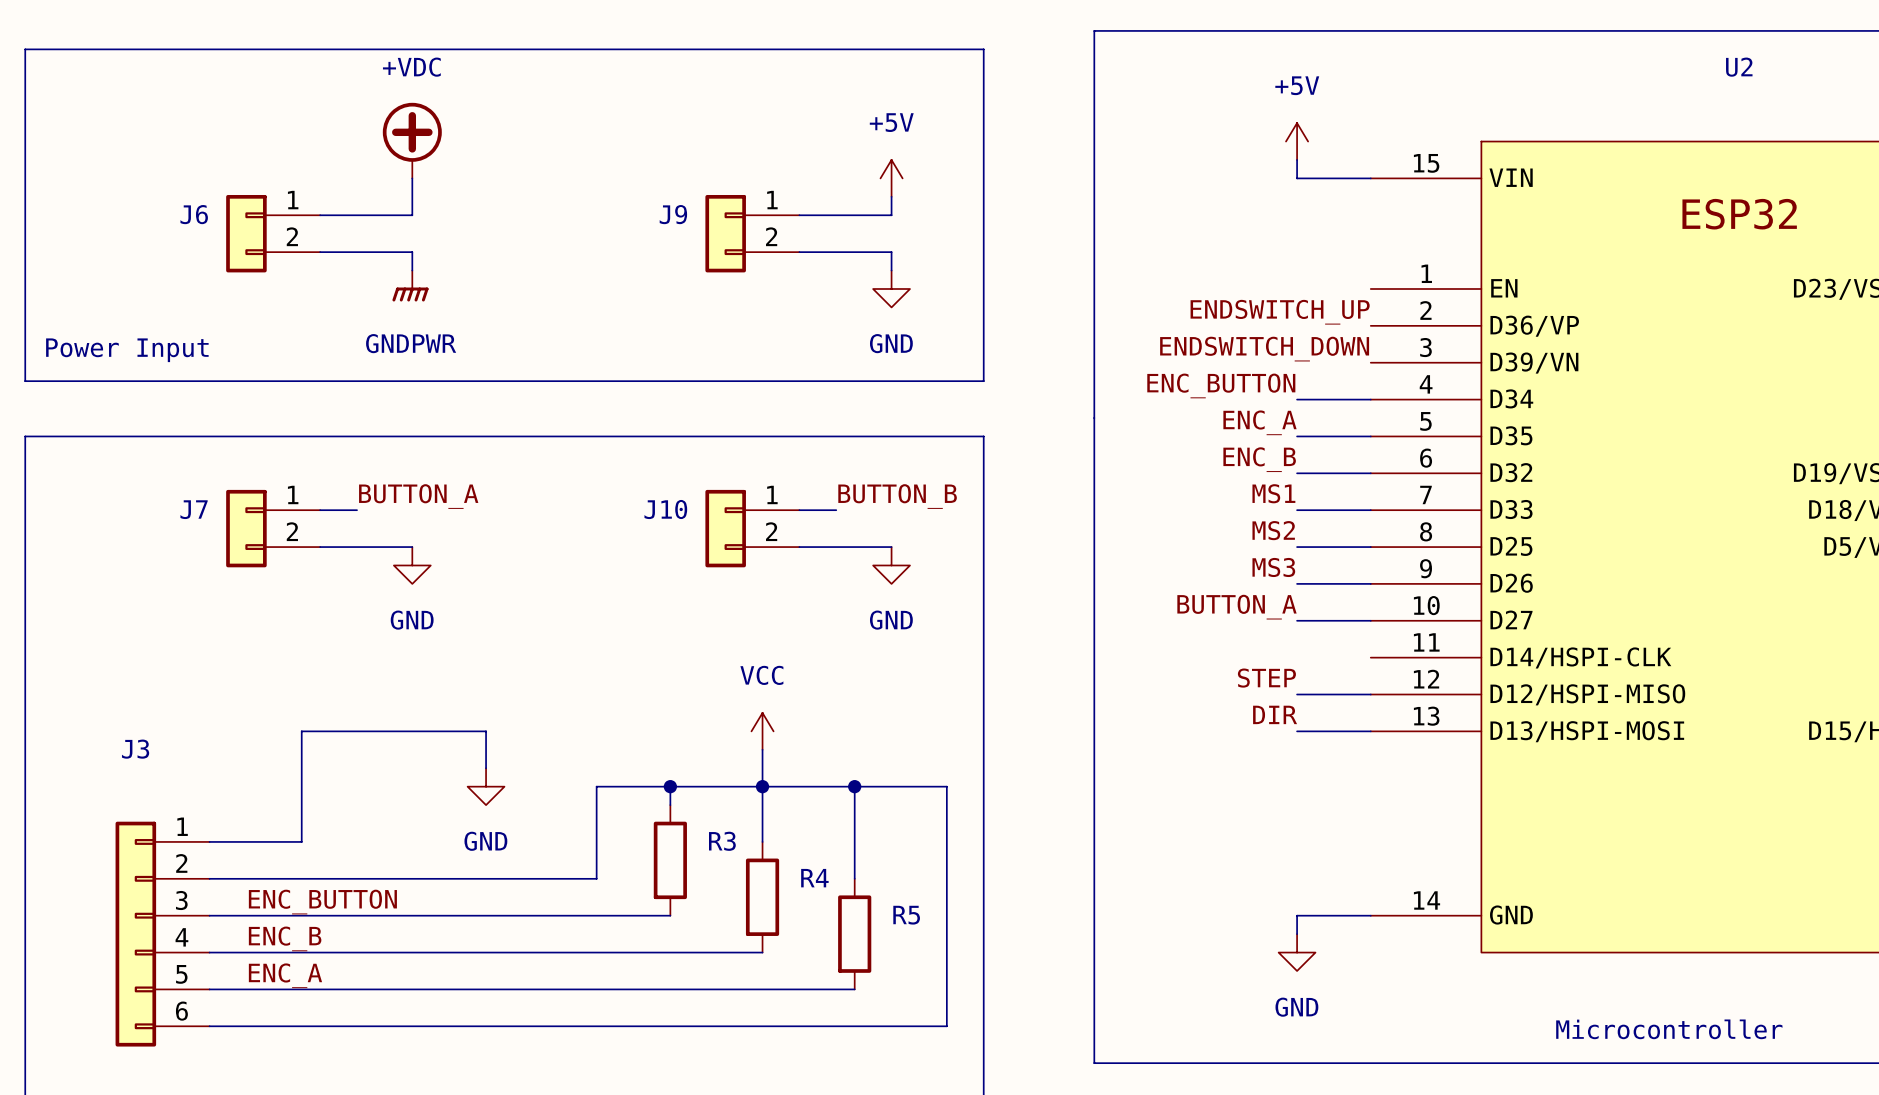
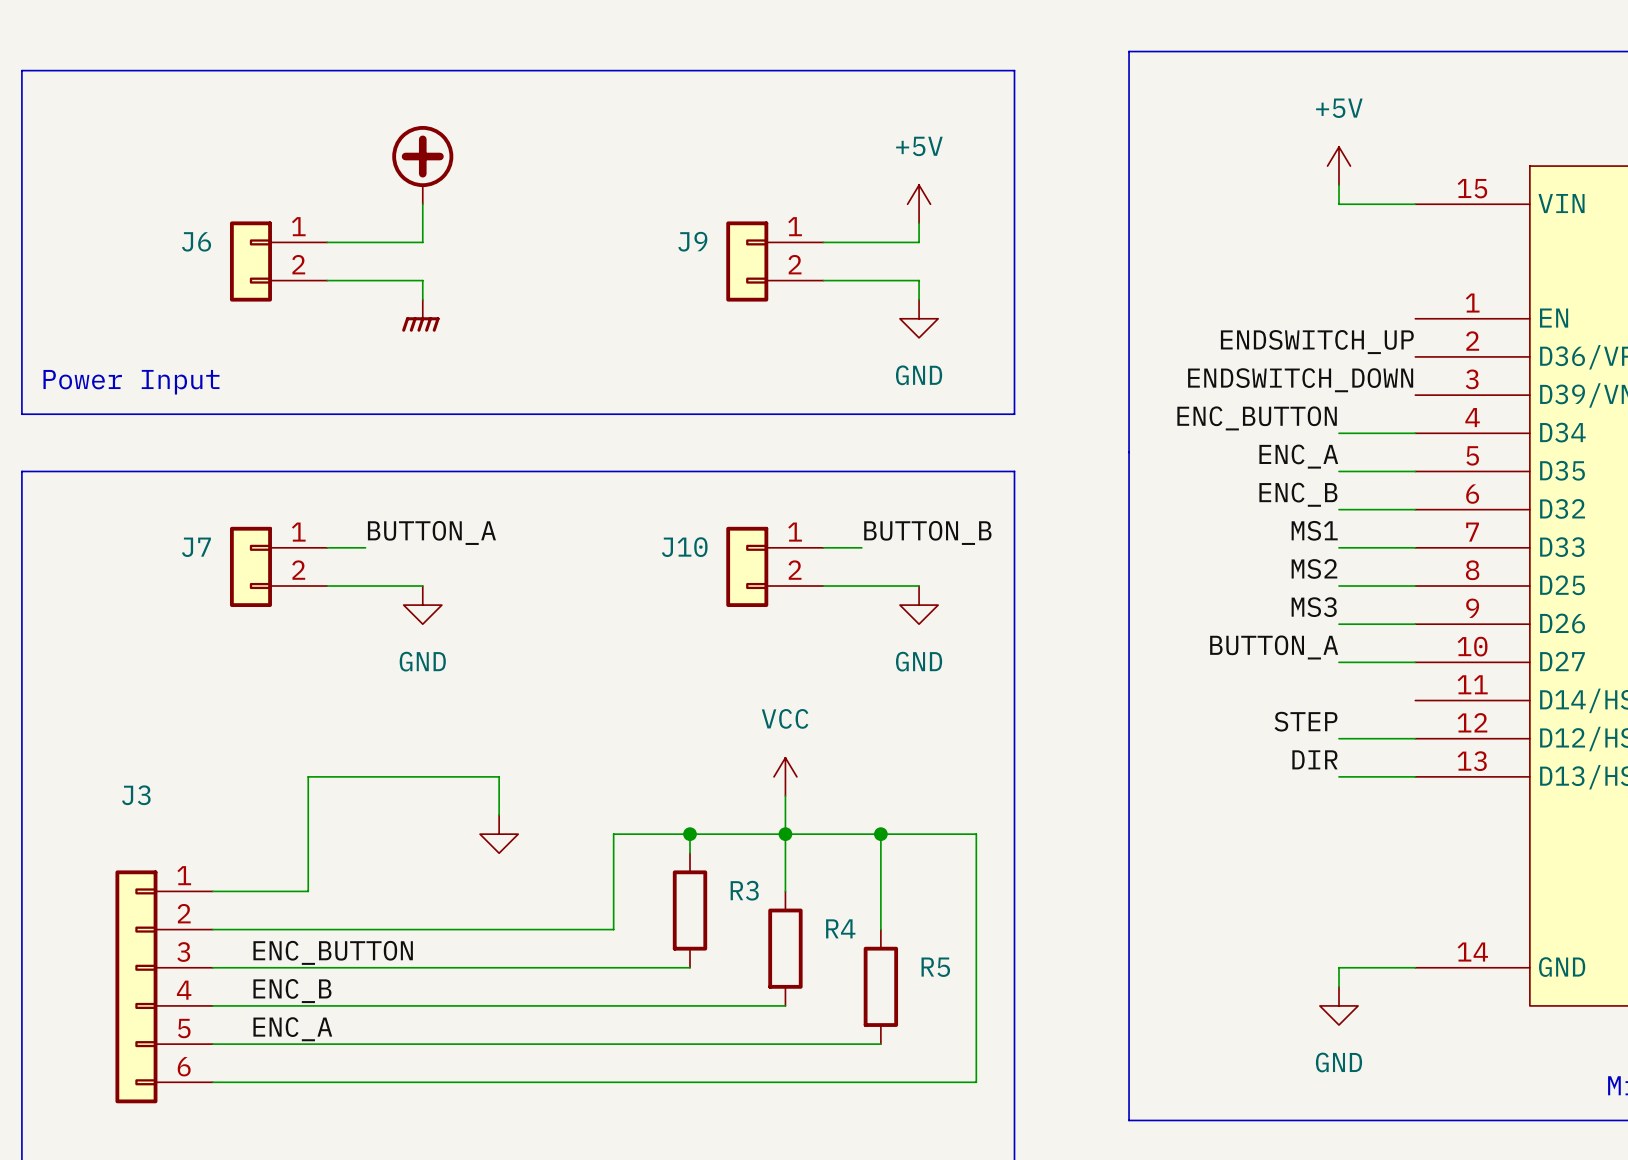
power symbol text: +VDC (411, 67) -> none
power symbol text: GNDPWR (411, 343) -> none
power symbol text: GND (485, 841) -> none

